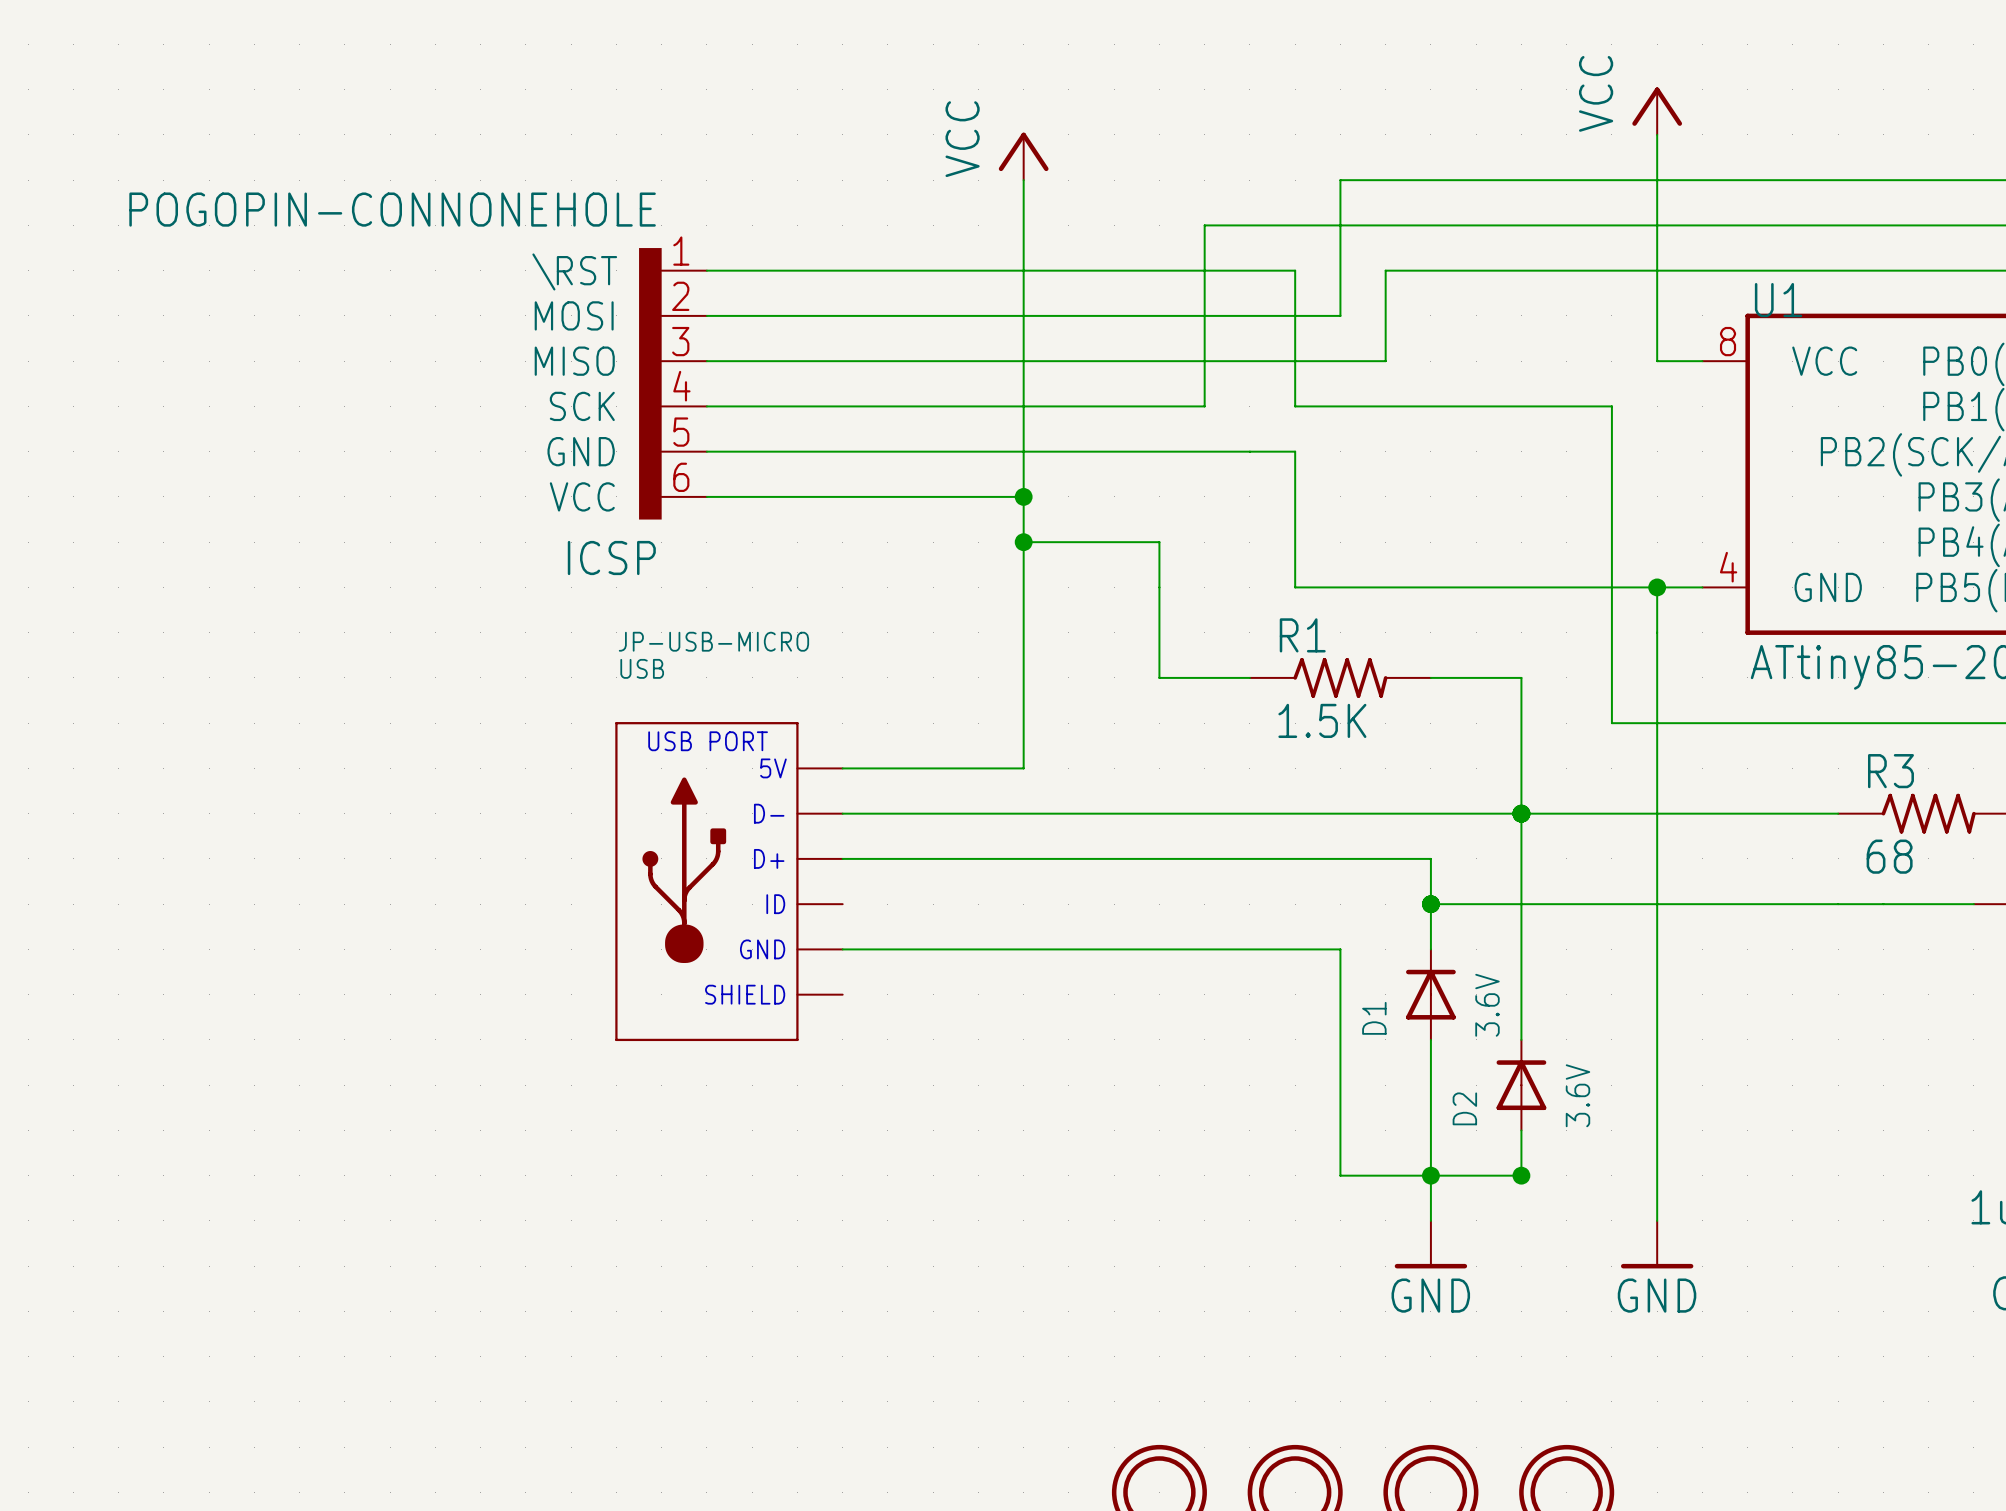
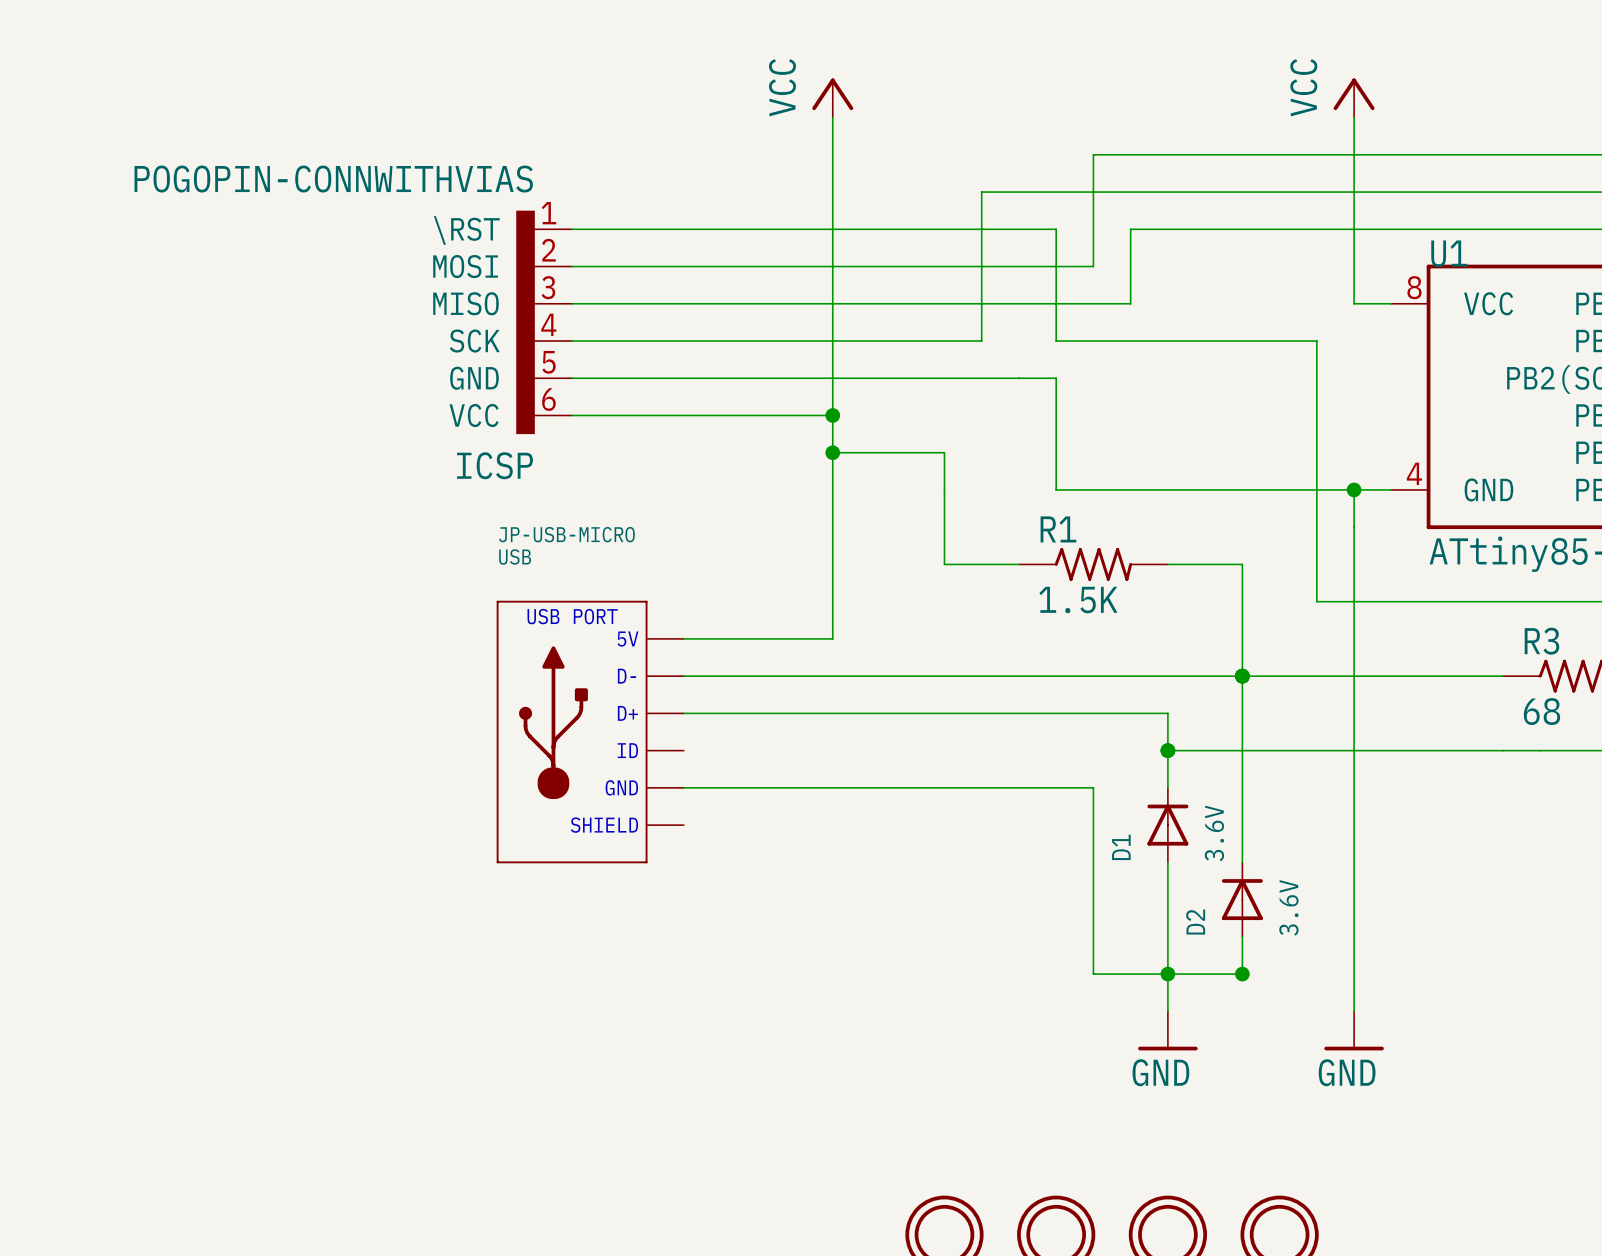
power symbol position: VCC (1023, 156) -> VCC (832, 98)
ICSP value: POGOPIN-CONNONEHOLE (392, 209) -> POGOPIN-CONNWITHVIAS (333, 179)

